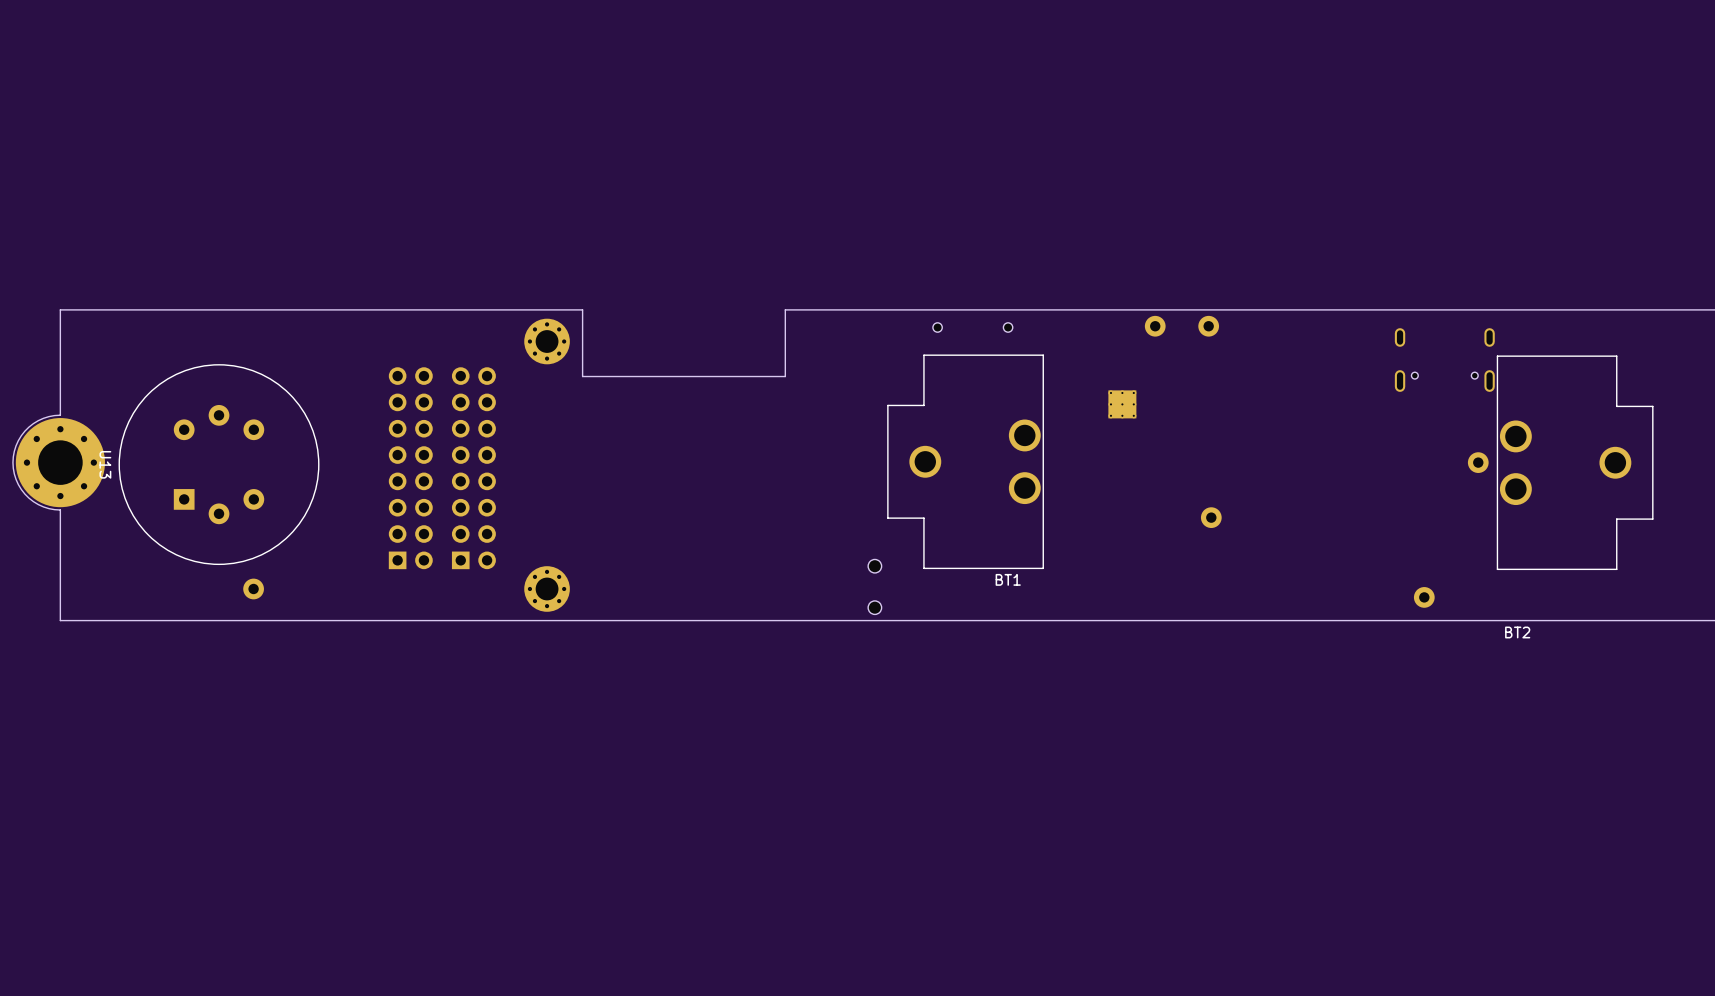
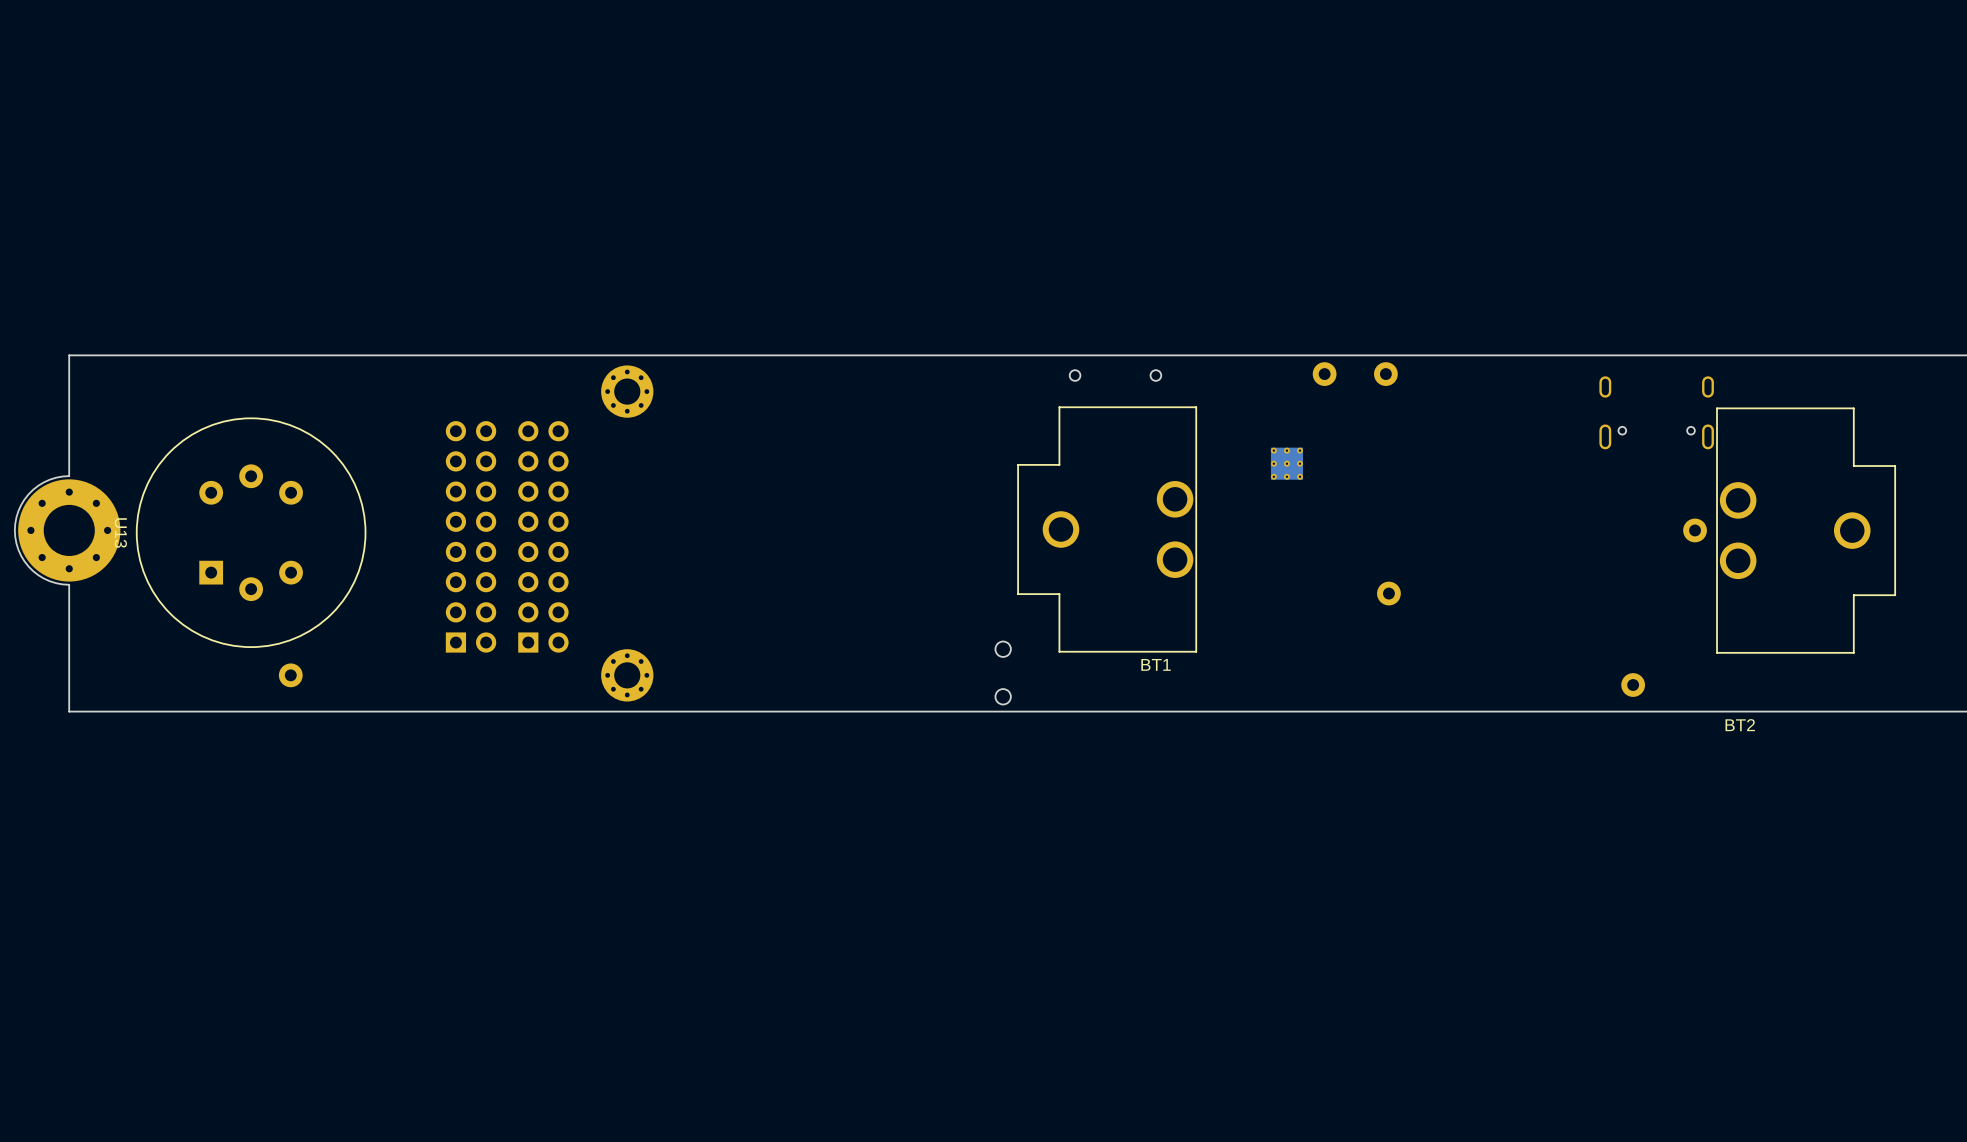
board edge: (785, 309) (785, 376) (582, 376) (582, 309) -> (900, 355) (668, 355)

